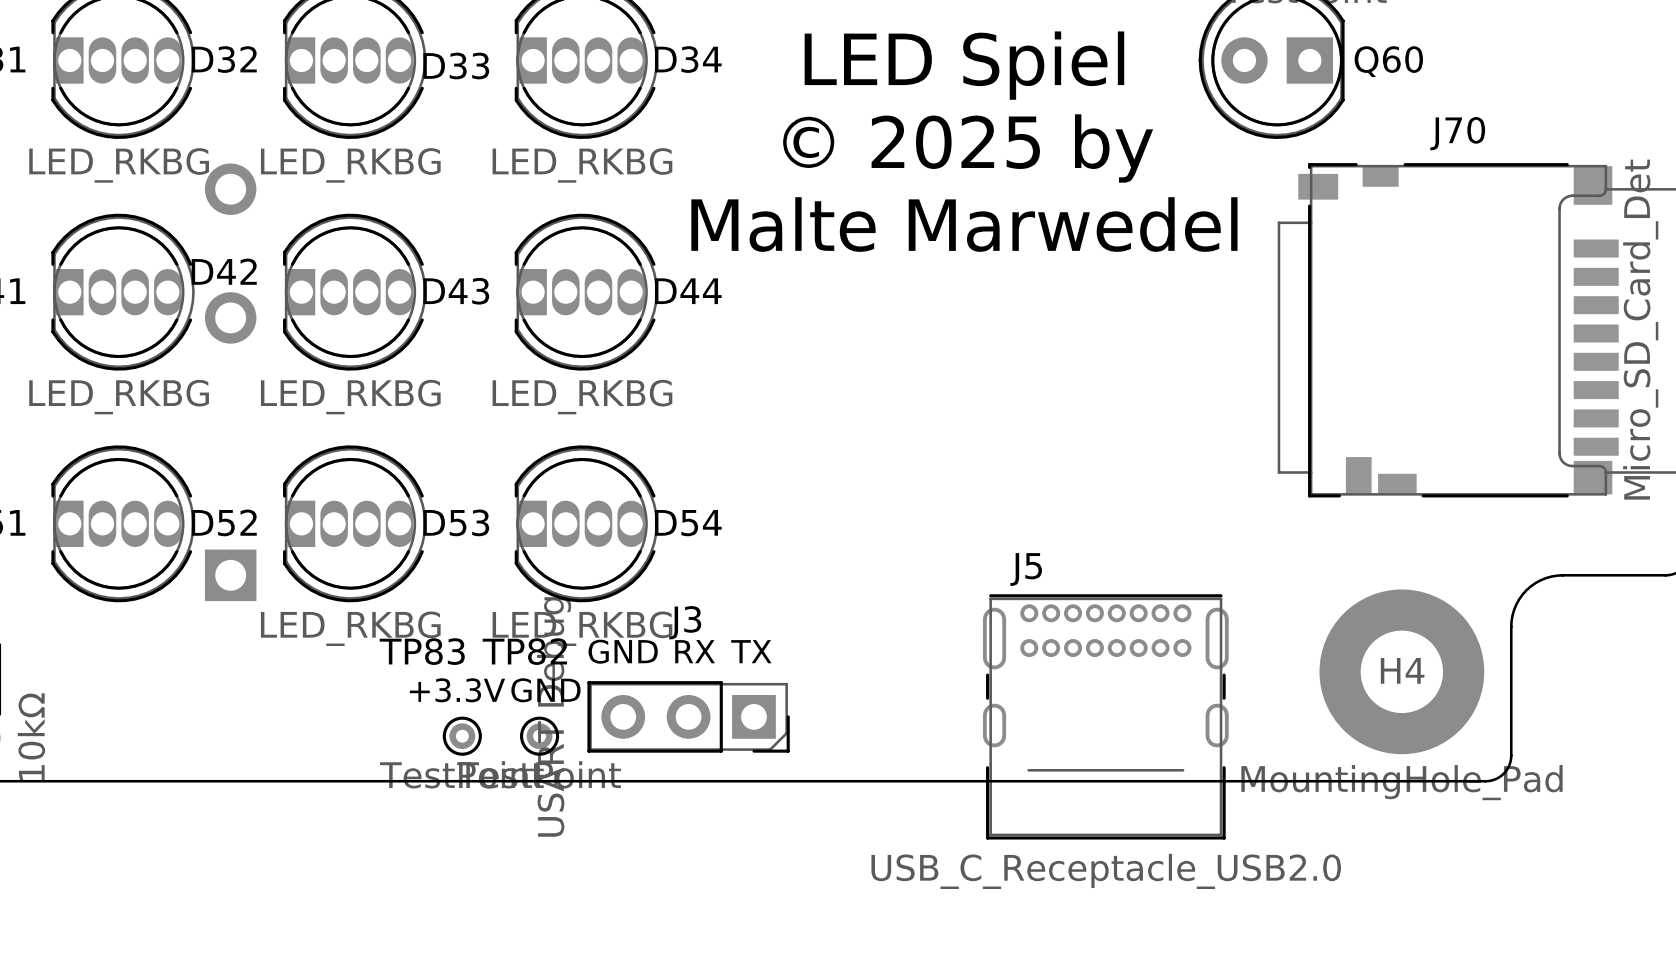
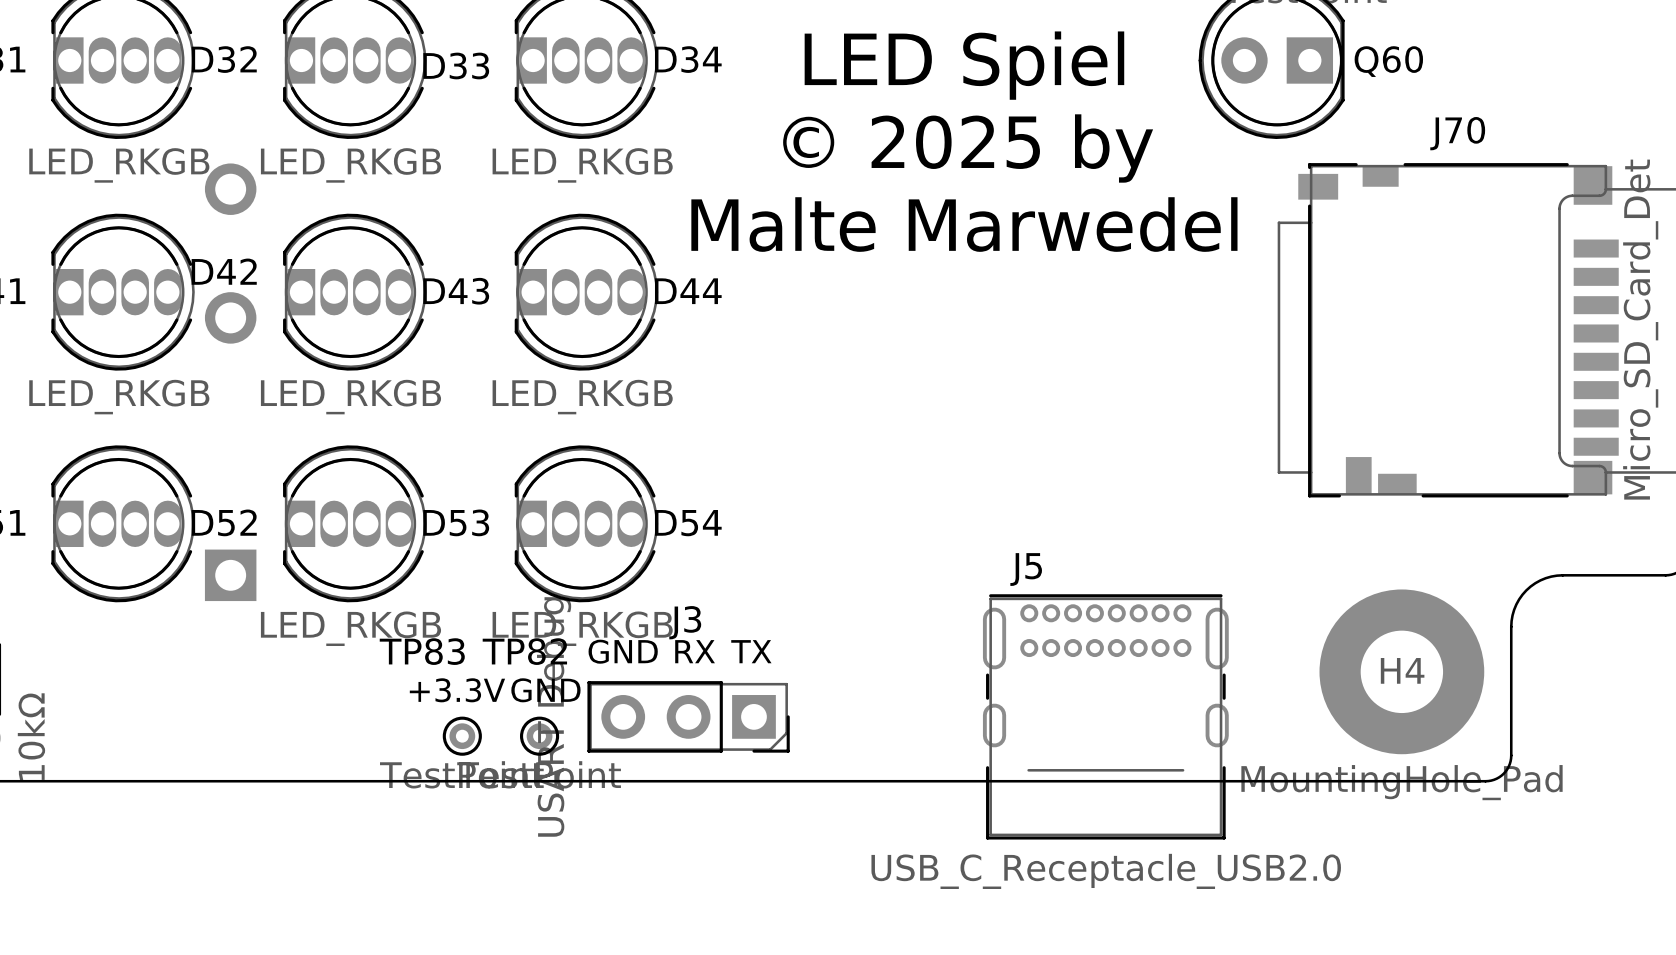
D32 value: LED_RKBG (119, 165) -> LED_RKGB (119, 165)
D33 value: LED_RKBG (350, 165) -> LED_RKGB (350, 165)
D34 value: LED_RKBG (582, 165) -> LED_RKGB (582, 165)
D42 value: LED_RKBG (119, 397) -> LED_RKGB (119, 397)
D43 value: LED_RKBG (350, 397) -> LED_RKGB (350, 397)
D44 value: LED_RKBG (582, 397) -> LED_RKGB (582, 397)
D53 value: LED_RKBG (350, 628) -> LED_RKGB (350, 628)
D54 value: LED_RKBG (582, 628) -> LED_RKGB (582, 628)

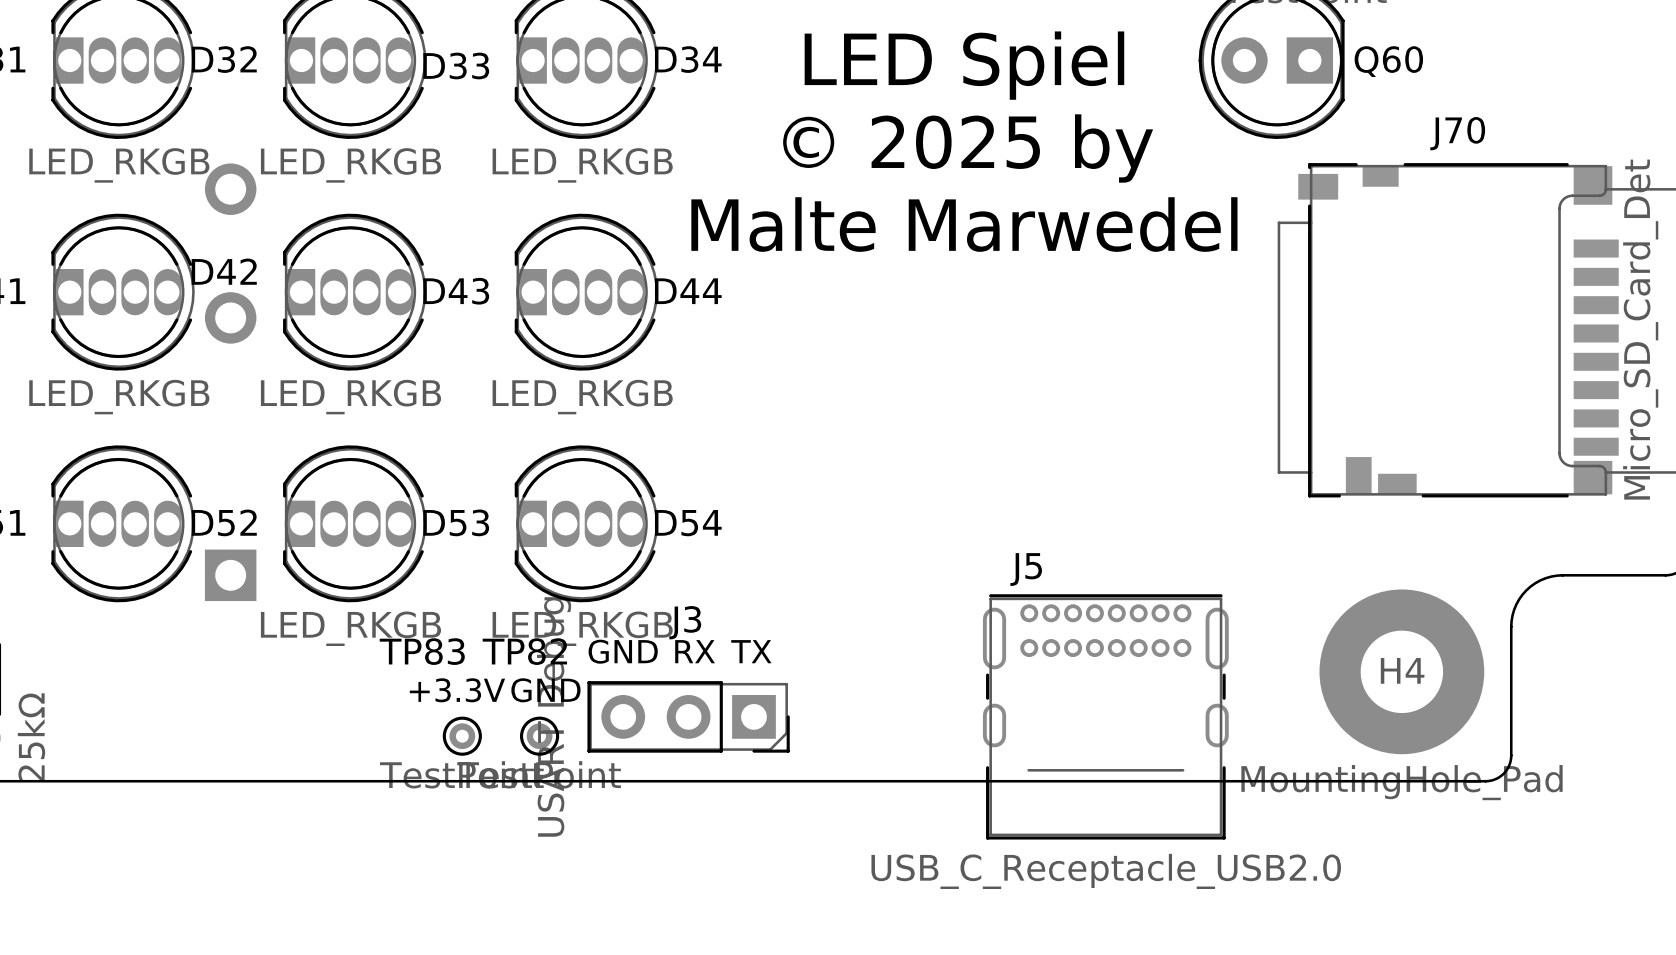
part value: 10kΩ (31, 736) -> 25kΩ (31, 737)

